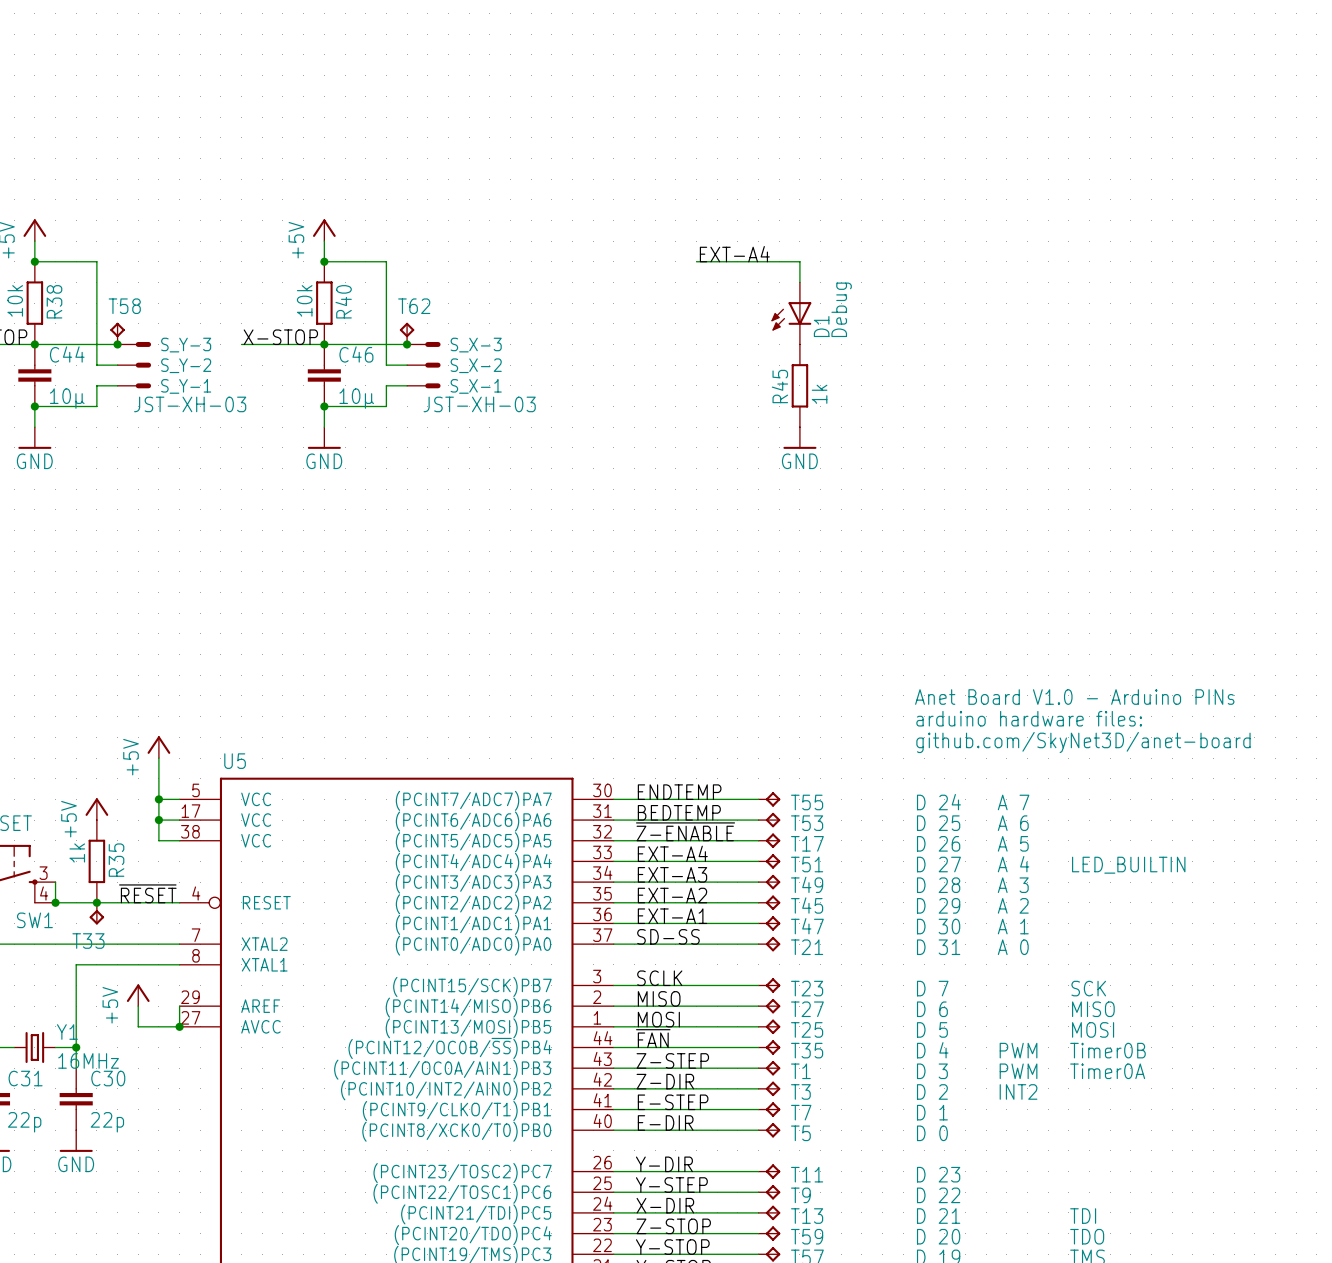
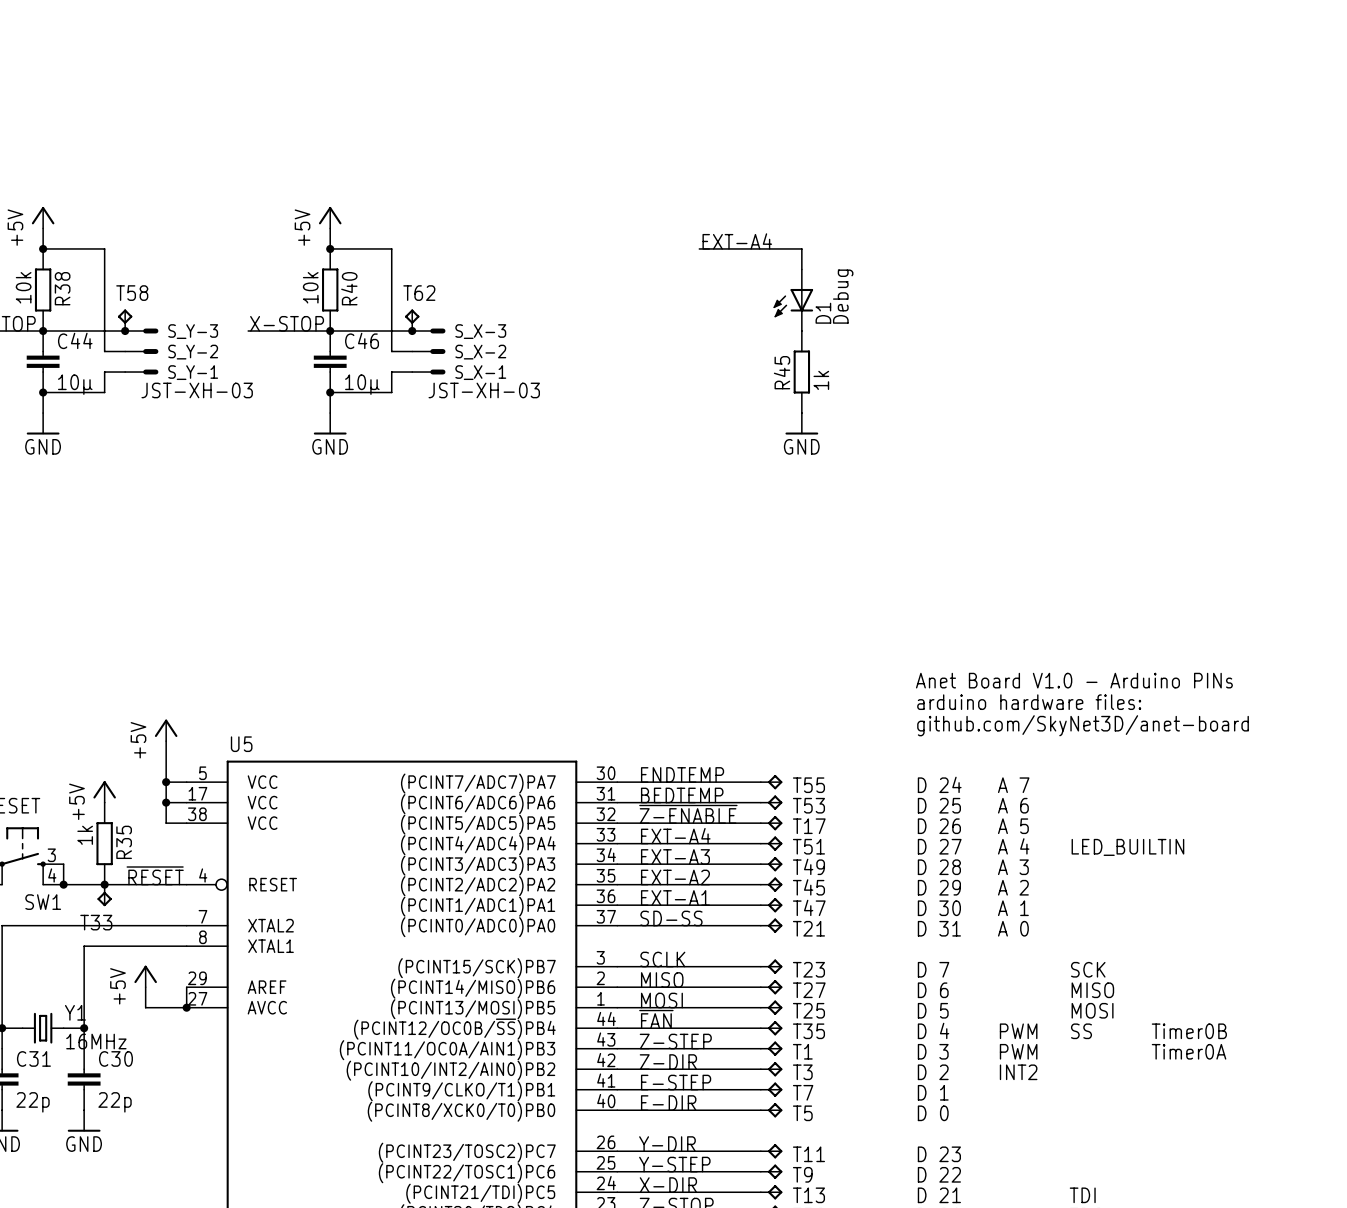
text: Timer0B (1107, 1050) -> SS (1081, 1031)
text: none -> Timer0B (1189, 1031)
text position: Timer0A (1107, 1071) -> Timer0A (1189, 1051)

